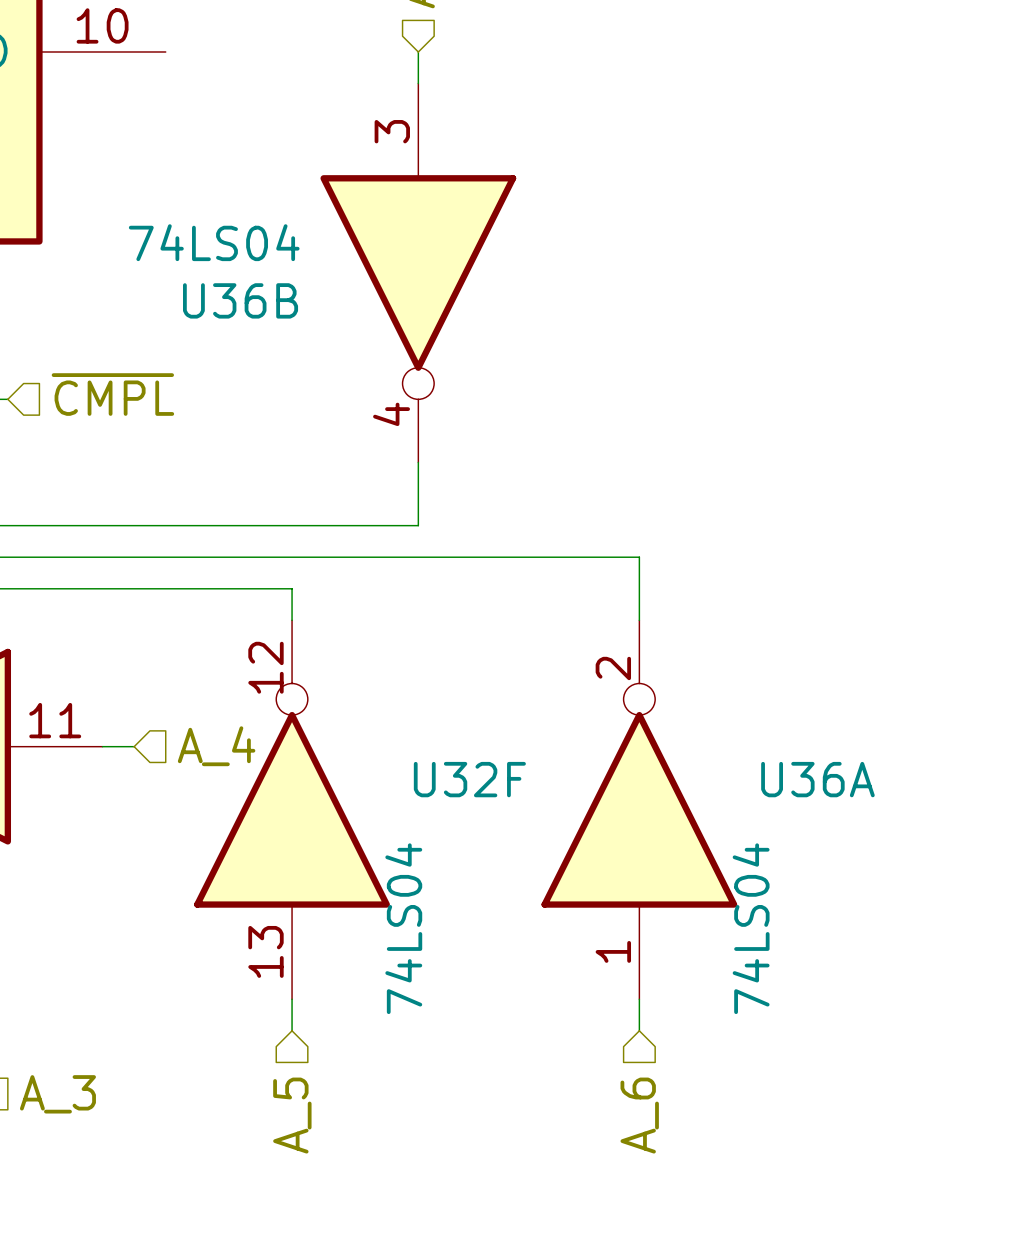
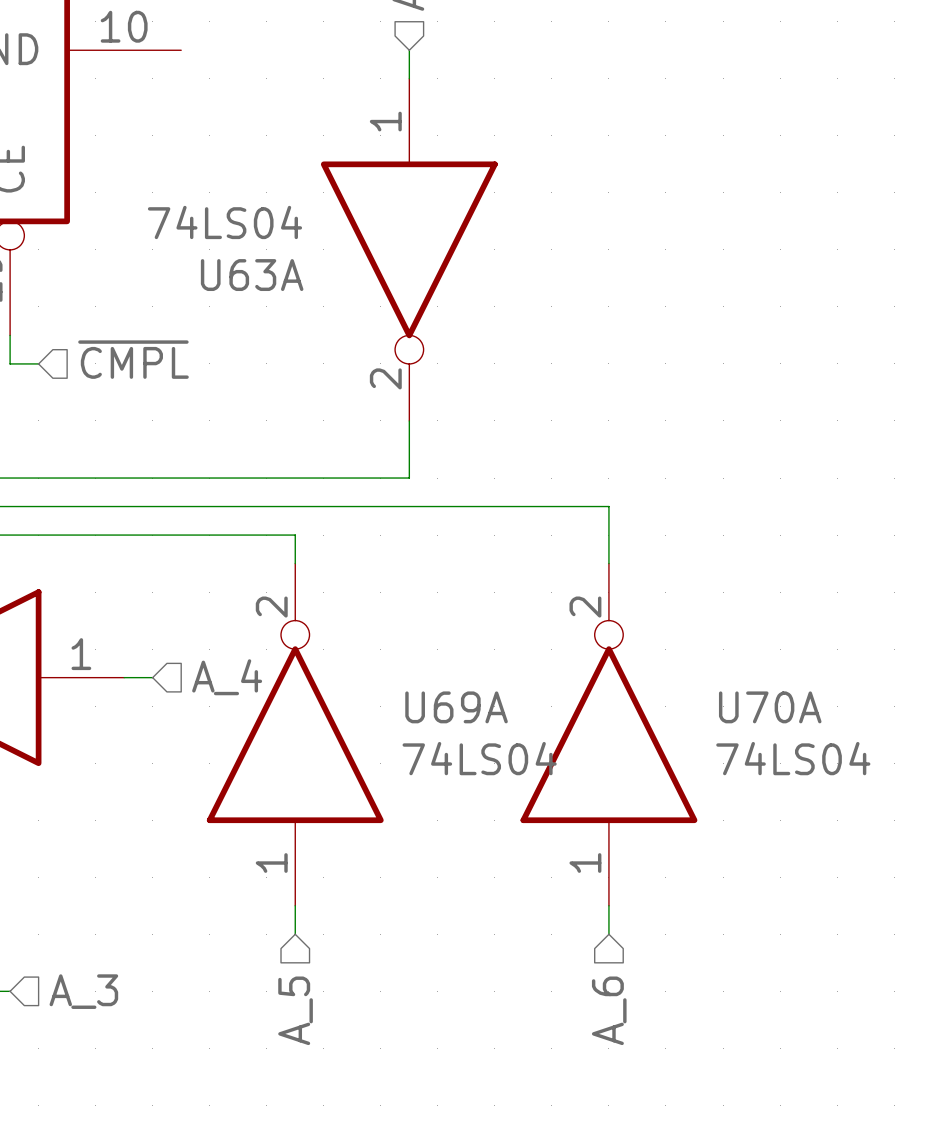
U36B pin number: 3 (392, 131) -> 1 (385, 121)
U36B name: U36B (240, 300) -> U63A (252, 275)
U36B pin number: 4 (391, 414) -> 2 (385, 378)
U32F pin number: 12 (265, 667) -> 2 (271, 607)
part pin number: 11 (55, 720) -> 1 (81, 654)
U32F name: U32F (469, 779) -> U69A (456, 707)
U36A name: U36A (817, 779) -> U70A (770, 707)
U32F value rotation: 0° (403, 928) -> 90° clockwise (479, 758)
U36A value rotation: 0° (751, 928) -> 90° clockwise (793, 758)
U32F pin number: 13 (265, 951) -> 1 (271, 863)

